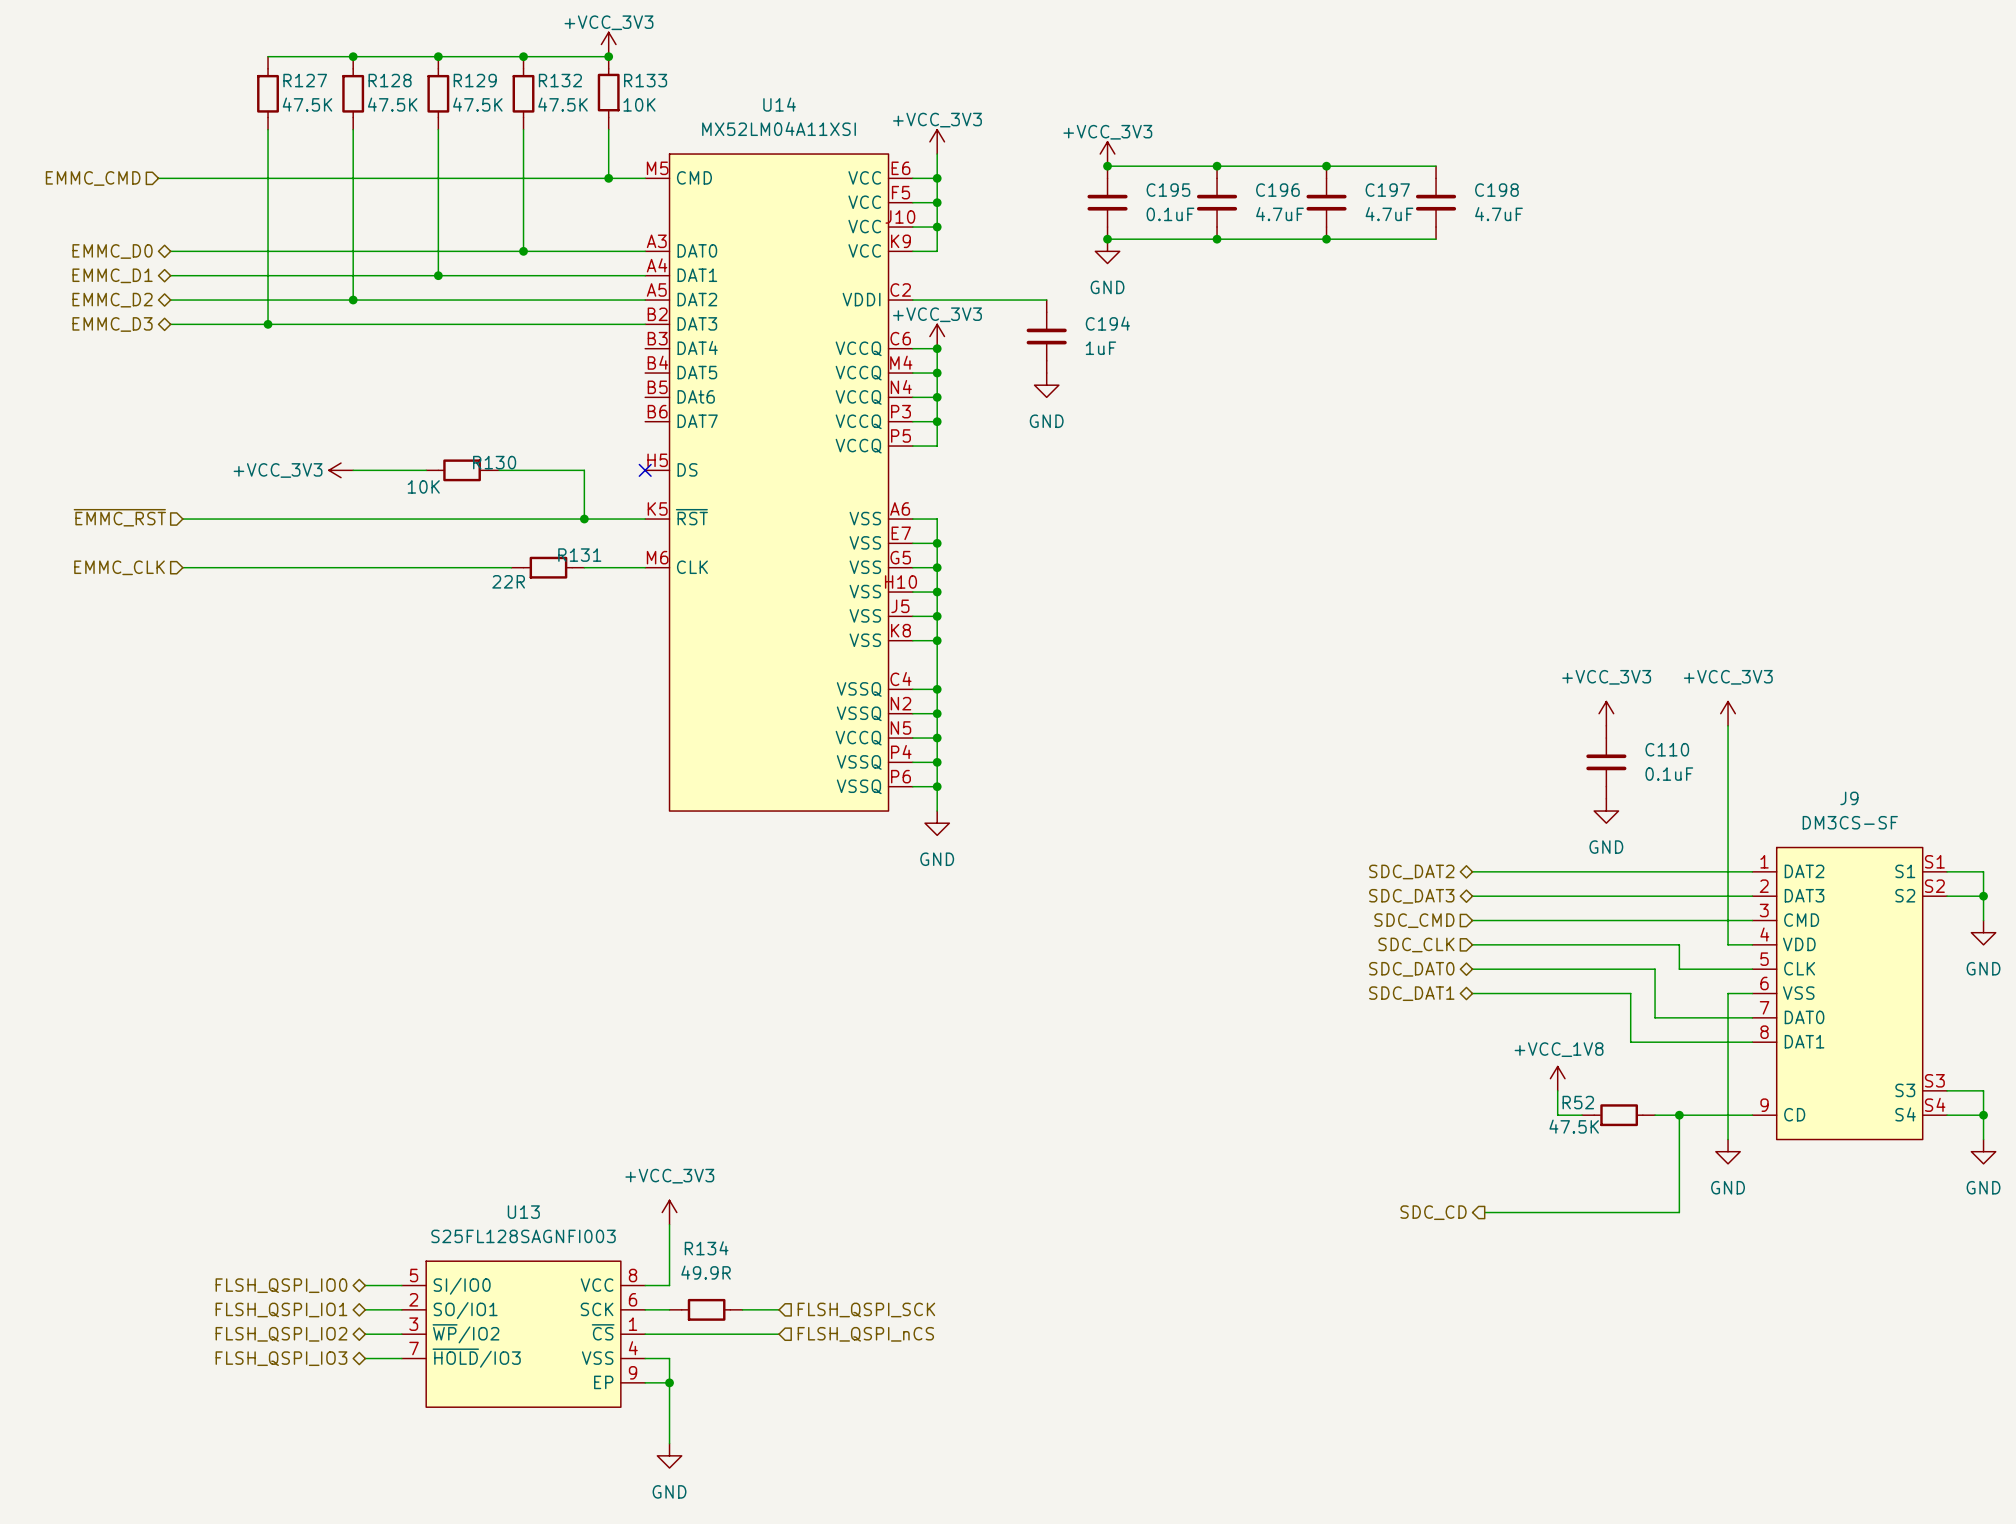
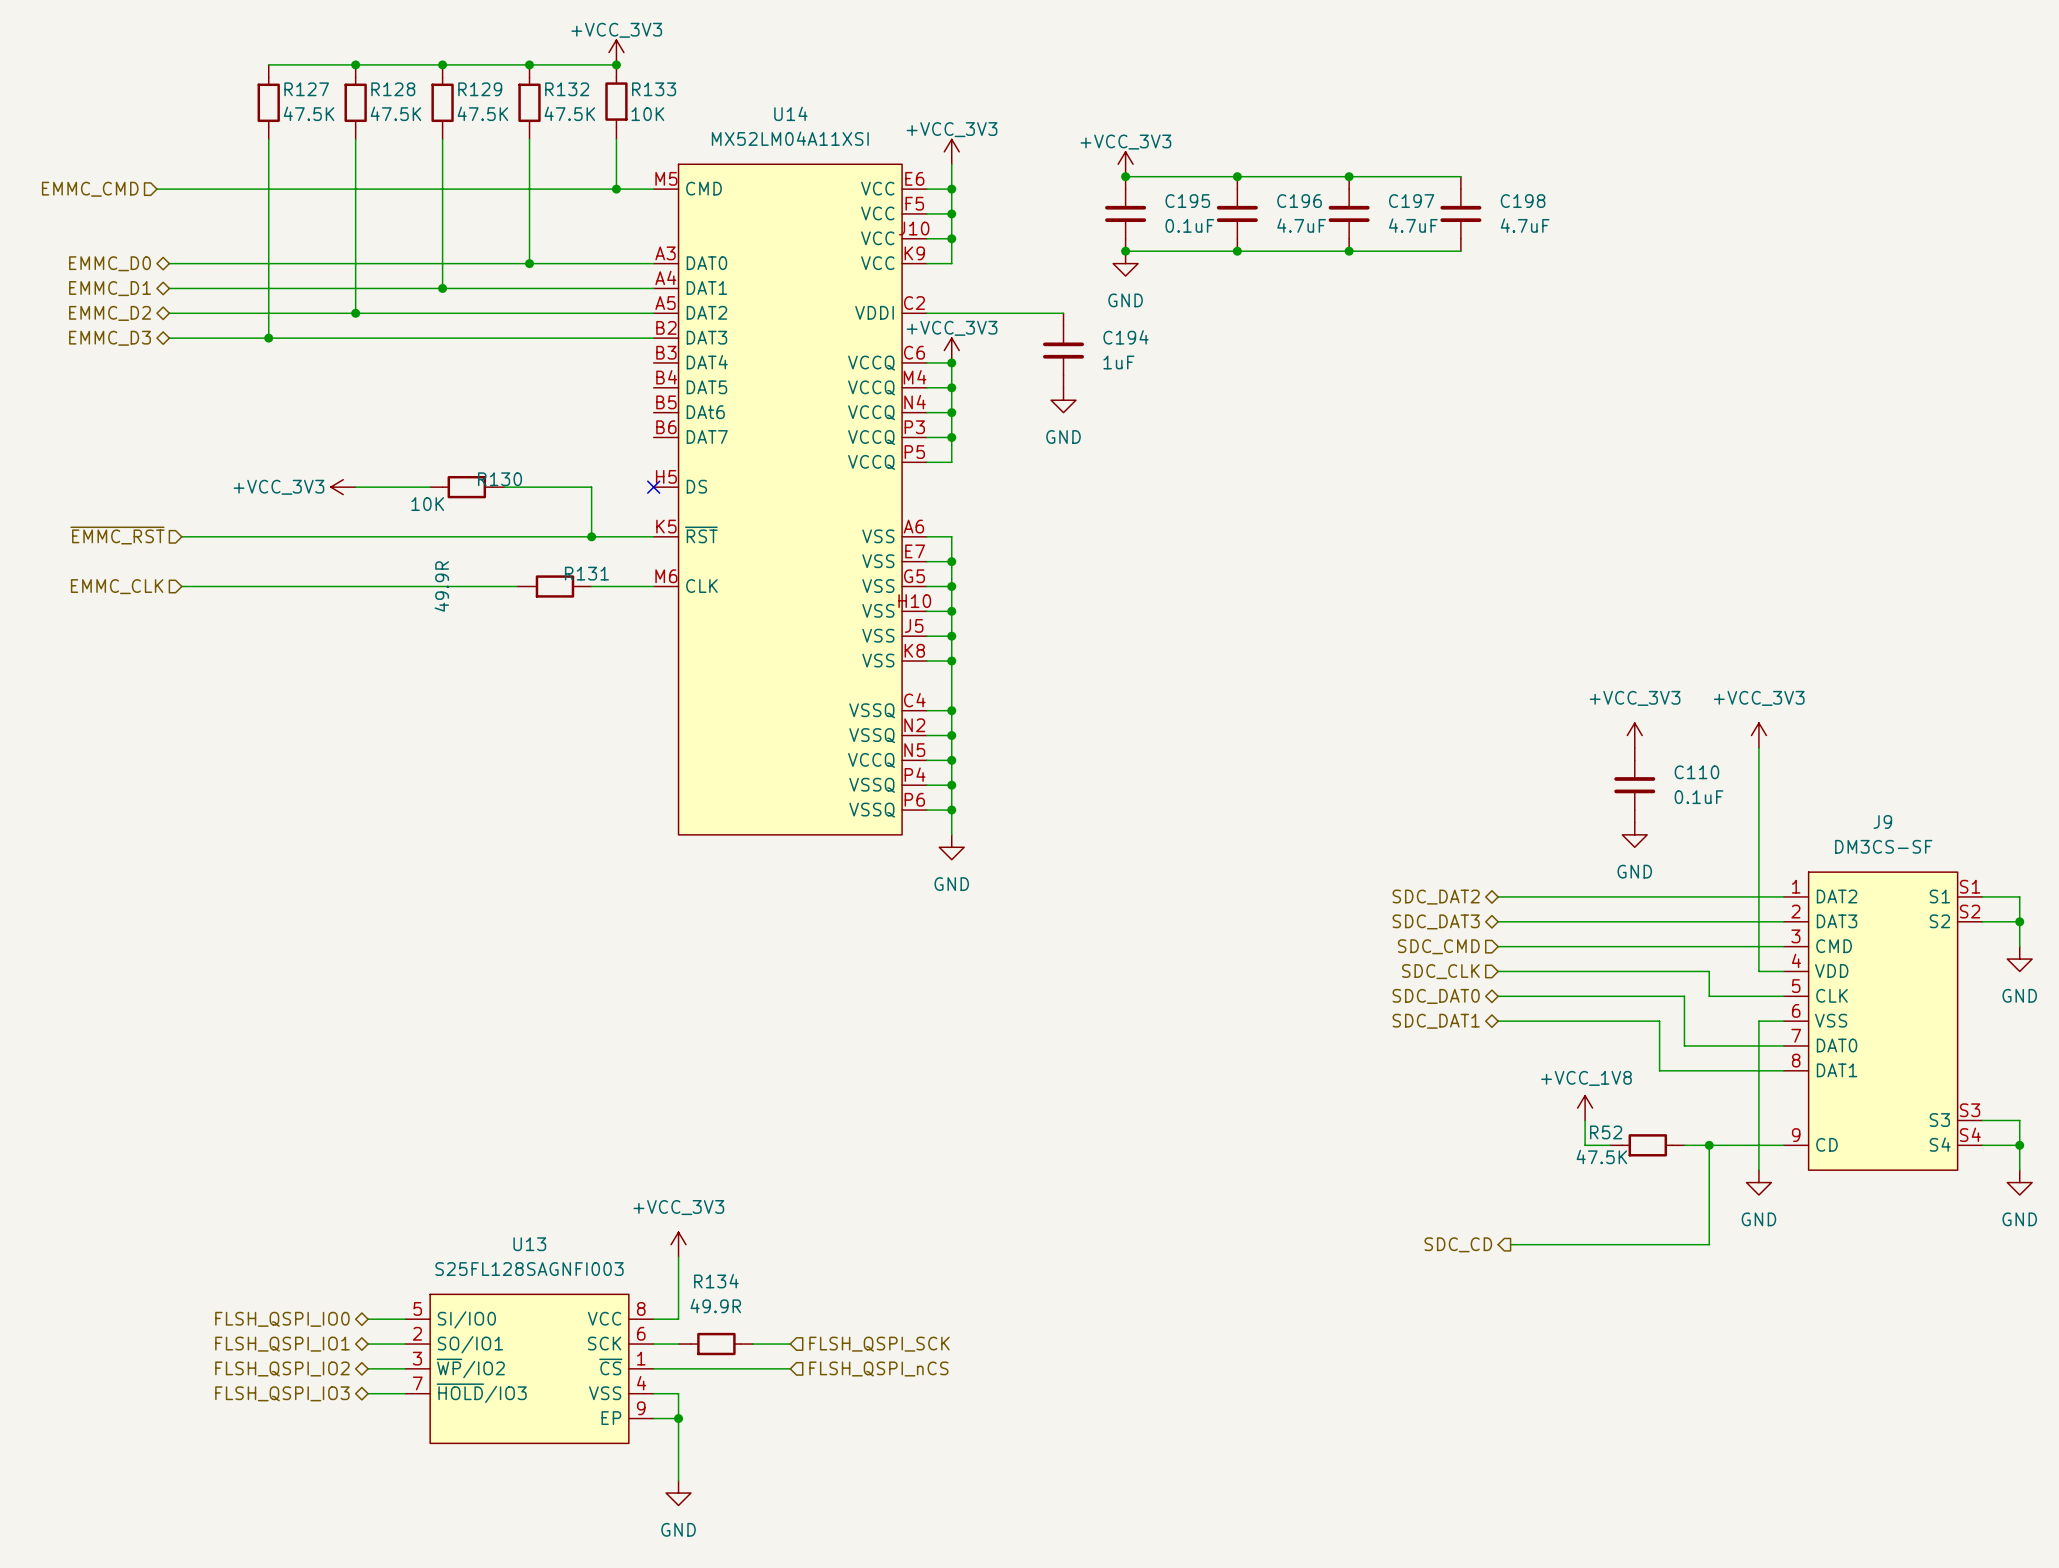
R131 text: 22R (508, 581) -> 49.9R (441, 586)

